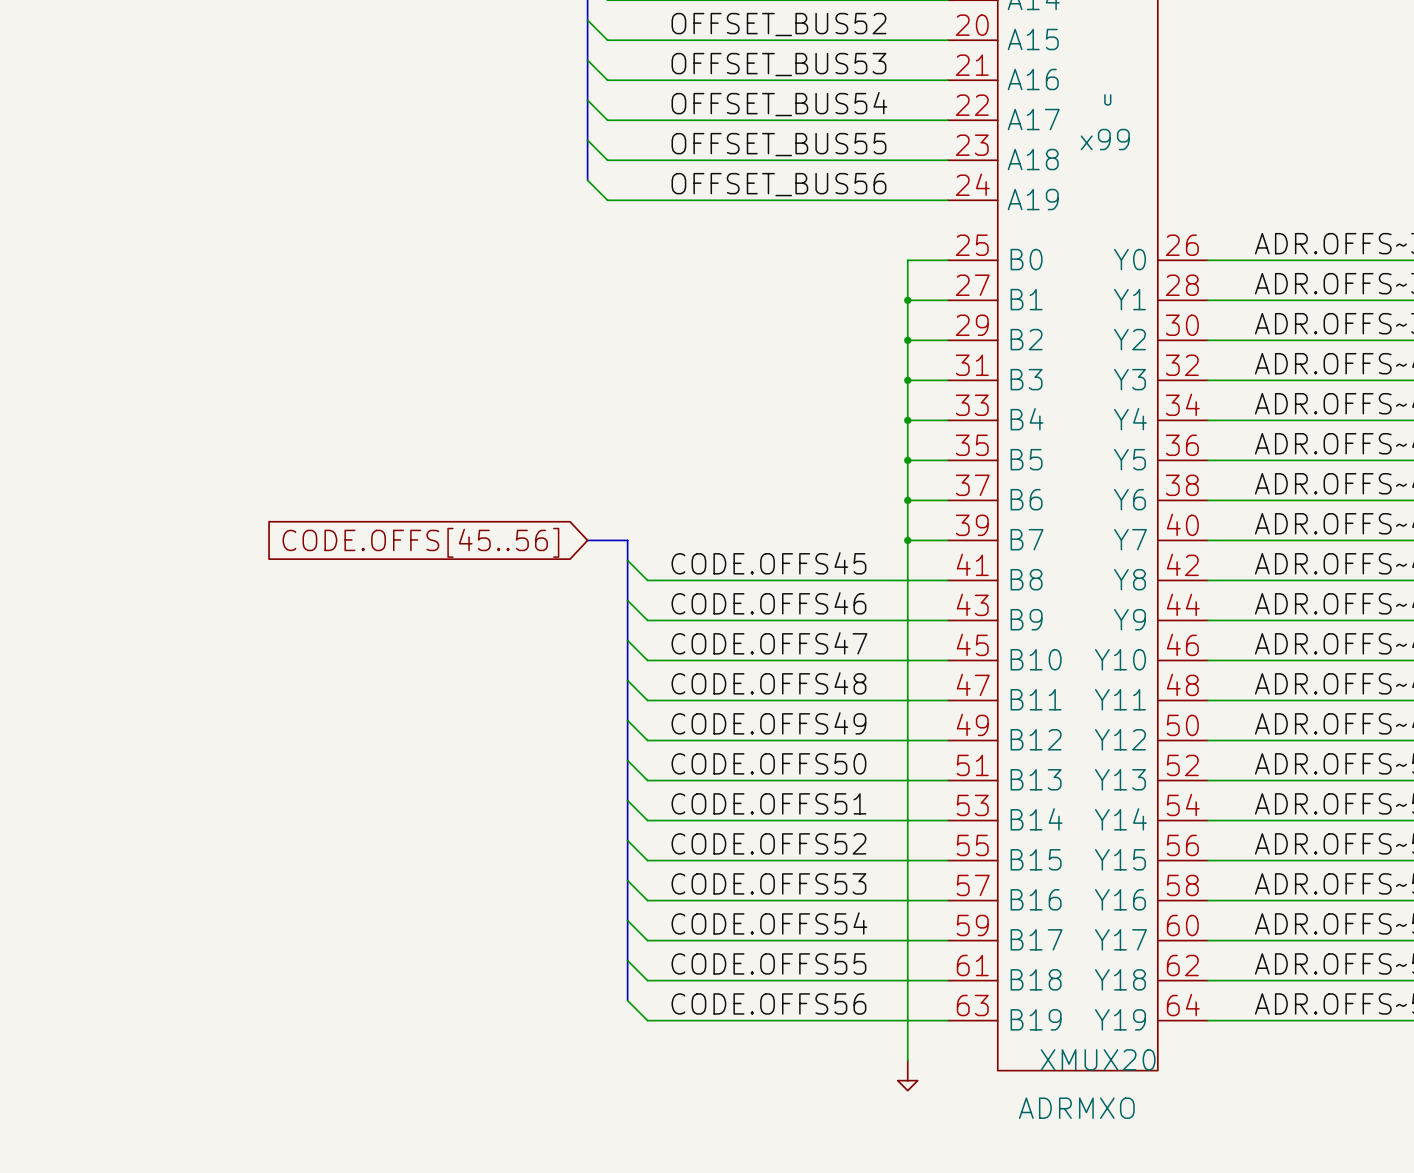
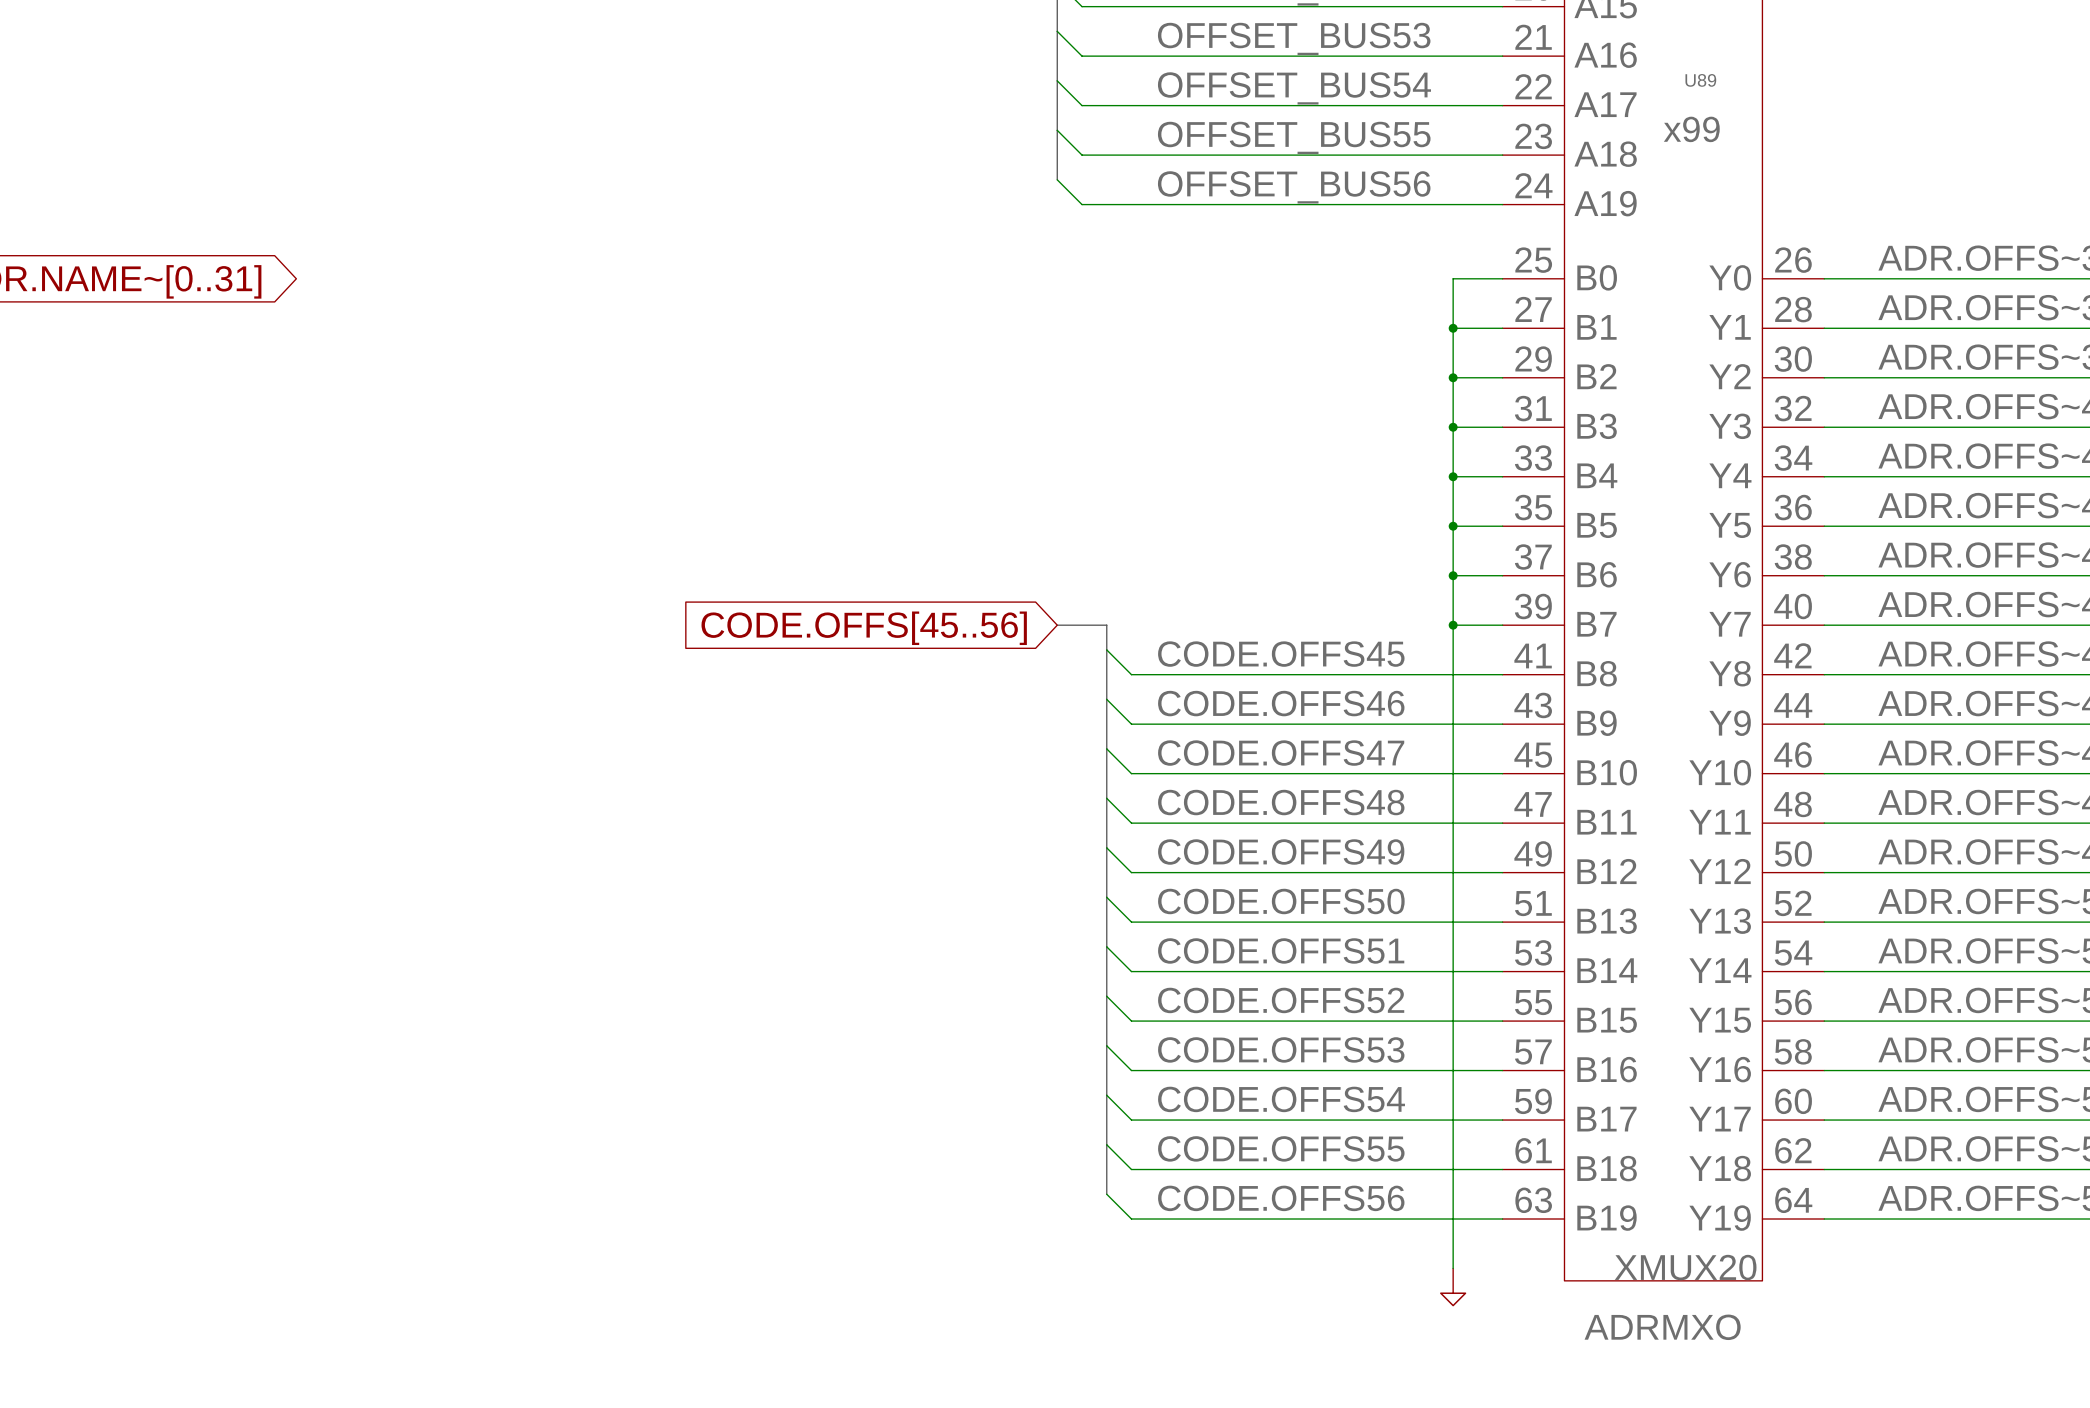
U name: U (1107, 99) -> U89 (1700, 80)

